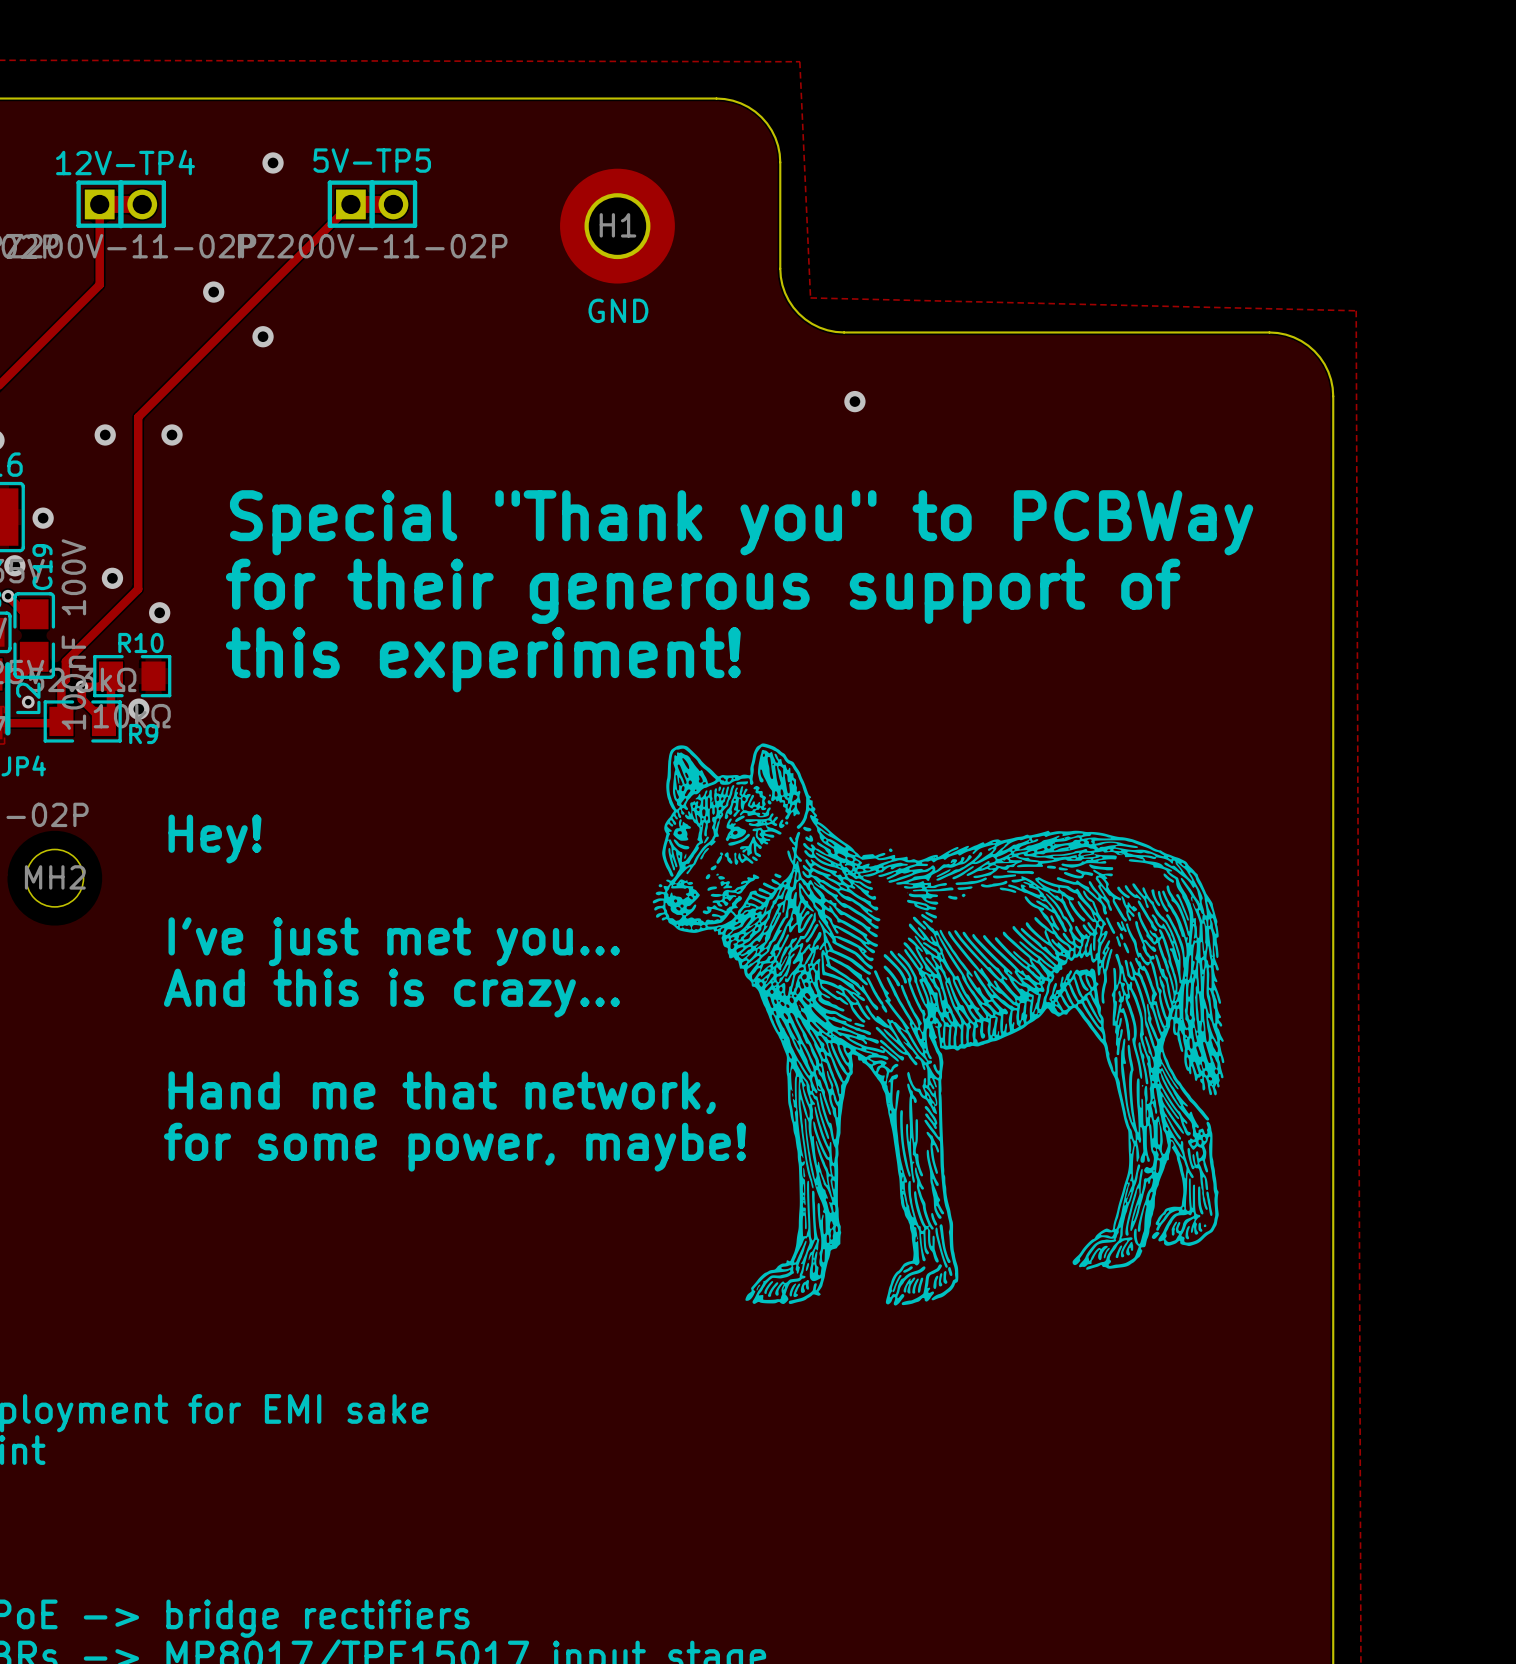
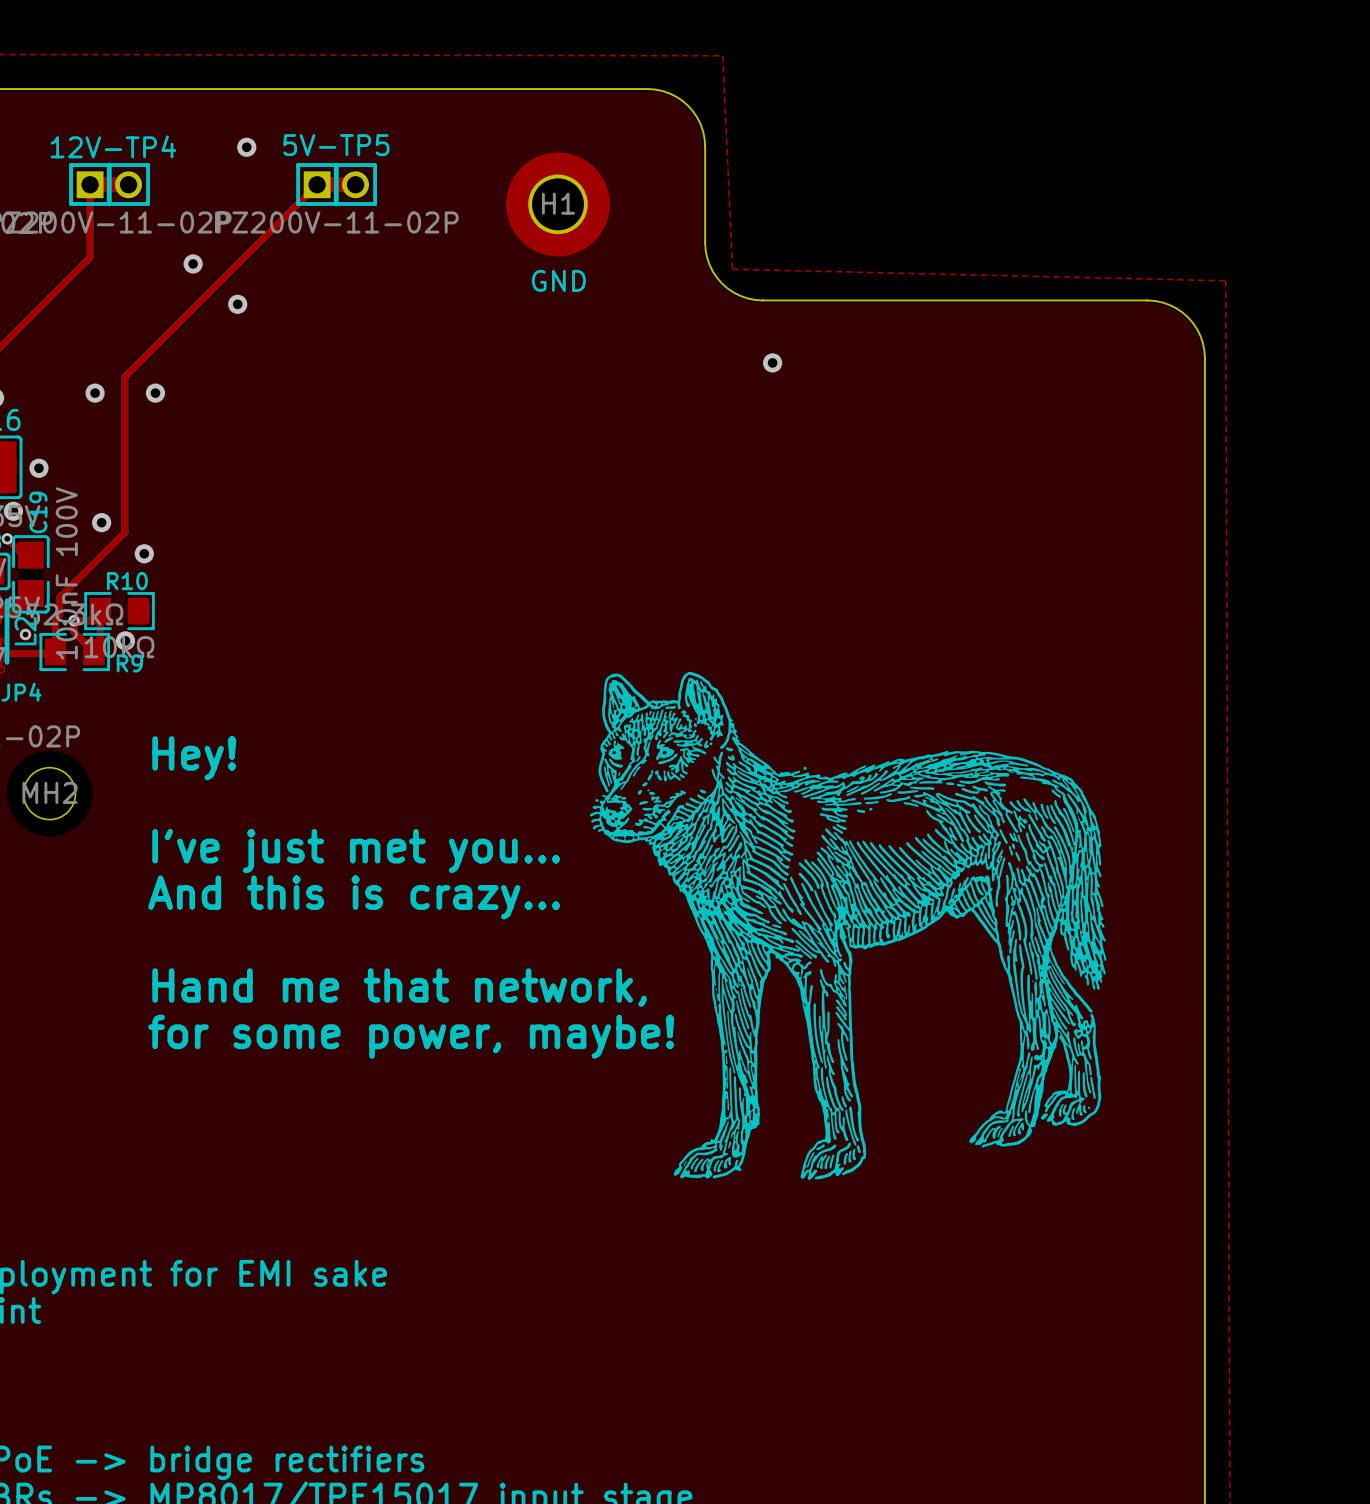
text: Special "Thank you" to PCBWay (741, 522) -> none
text: for their generous support of (703, 591) -> none
text: this experiment! (483, 659) -> none

